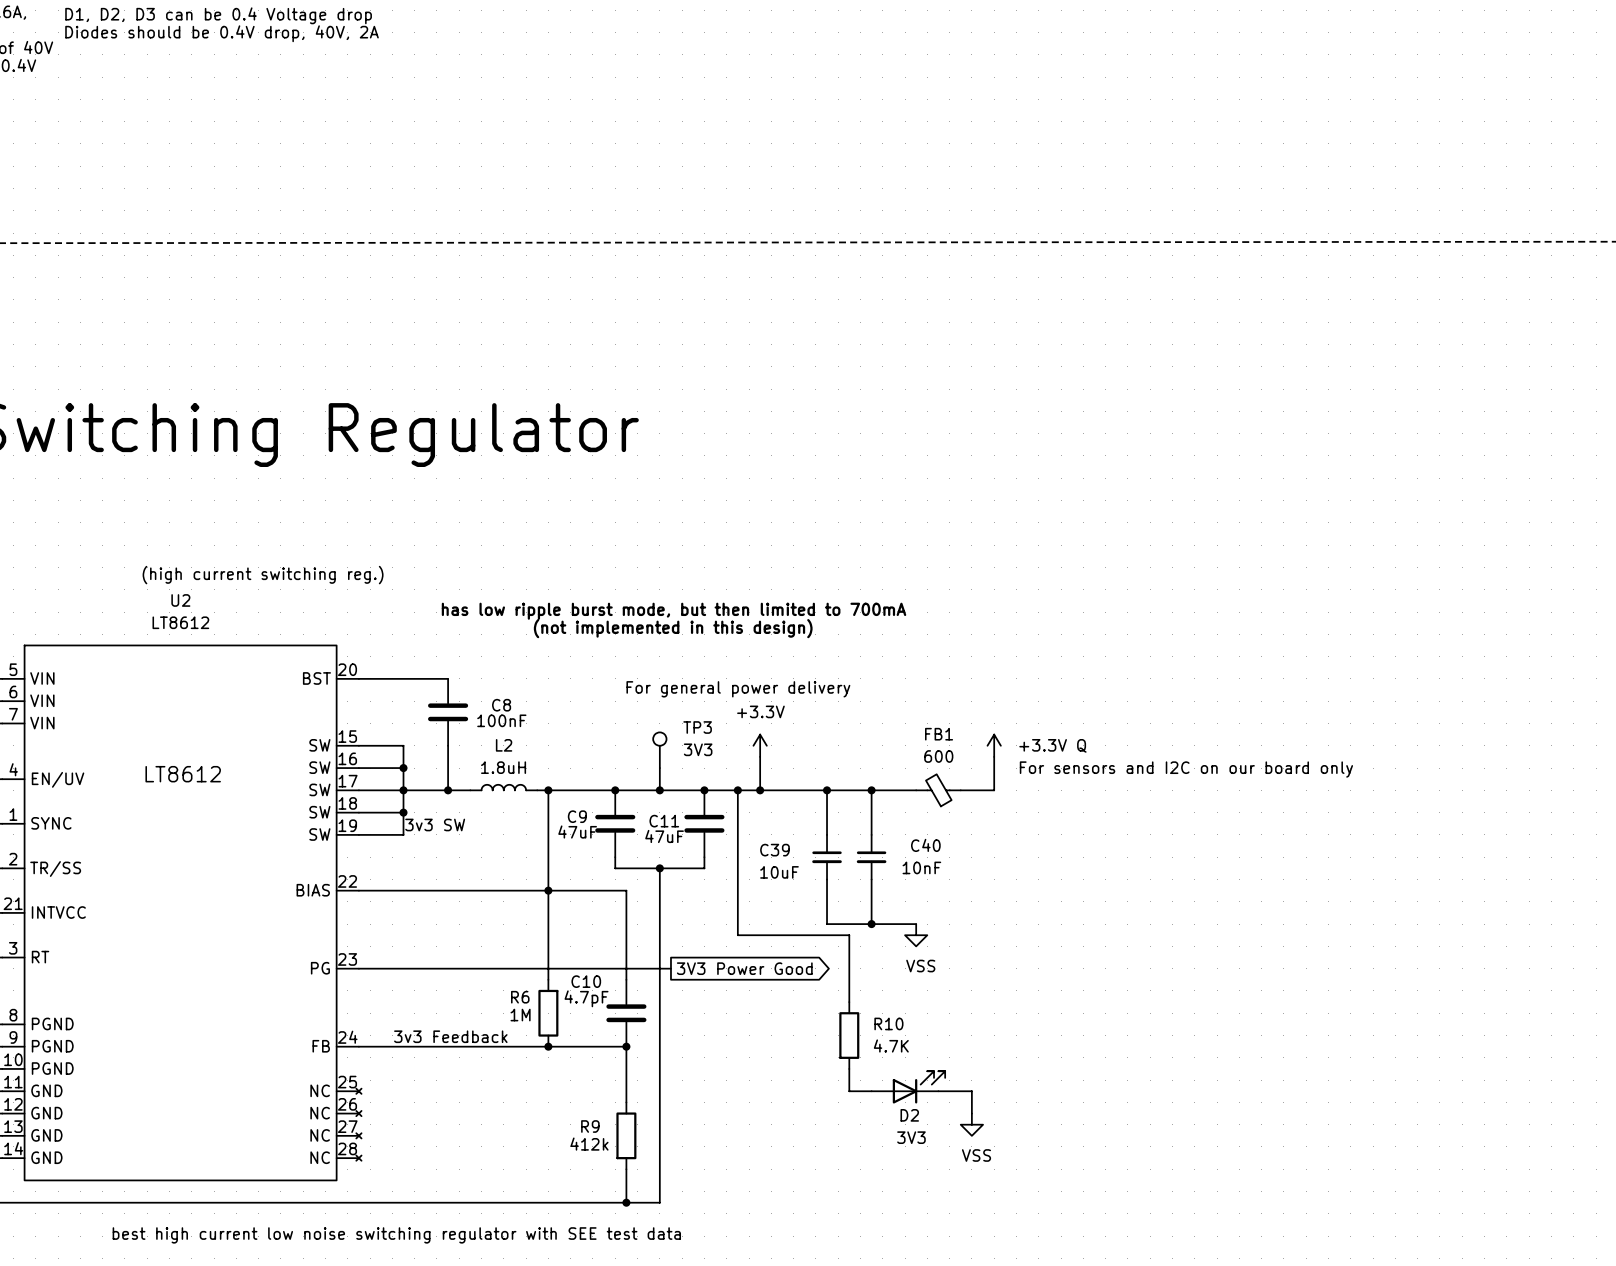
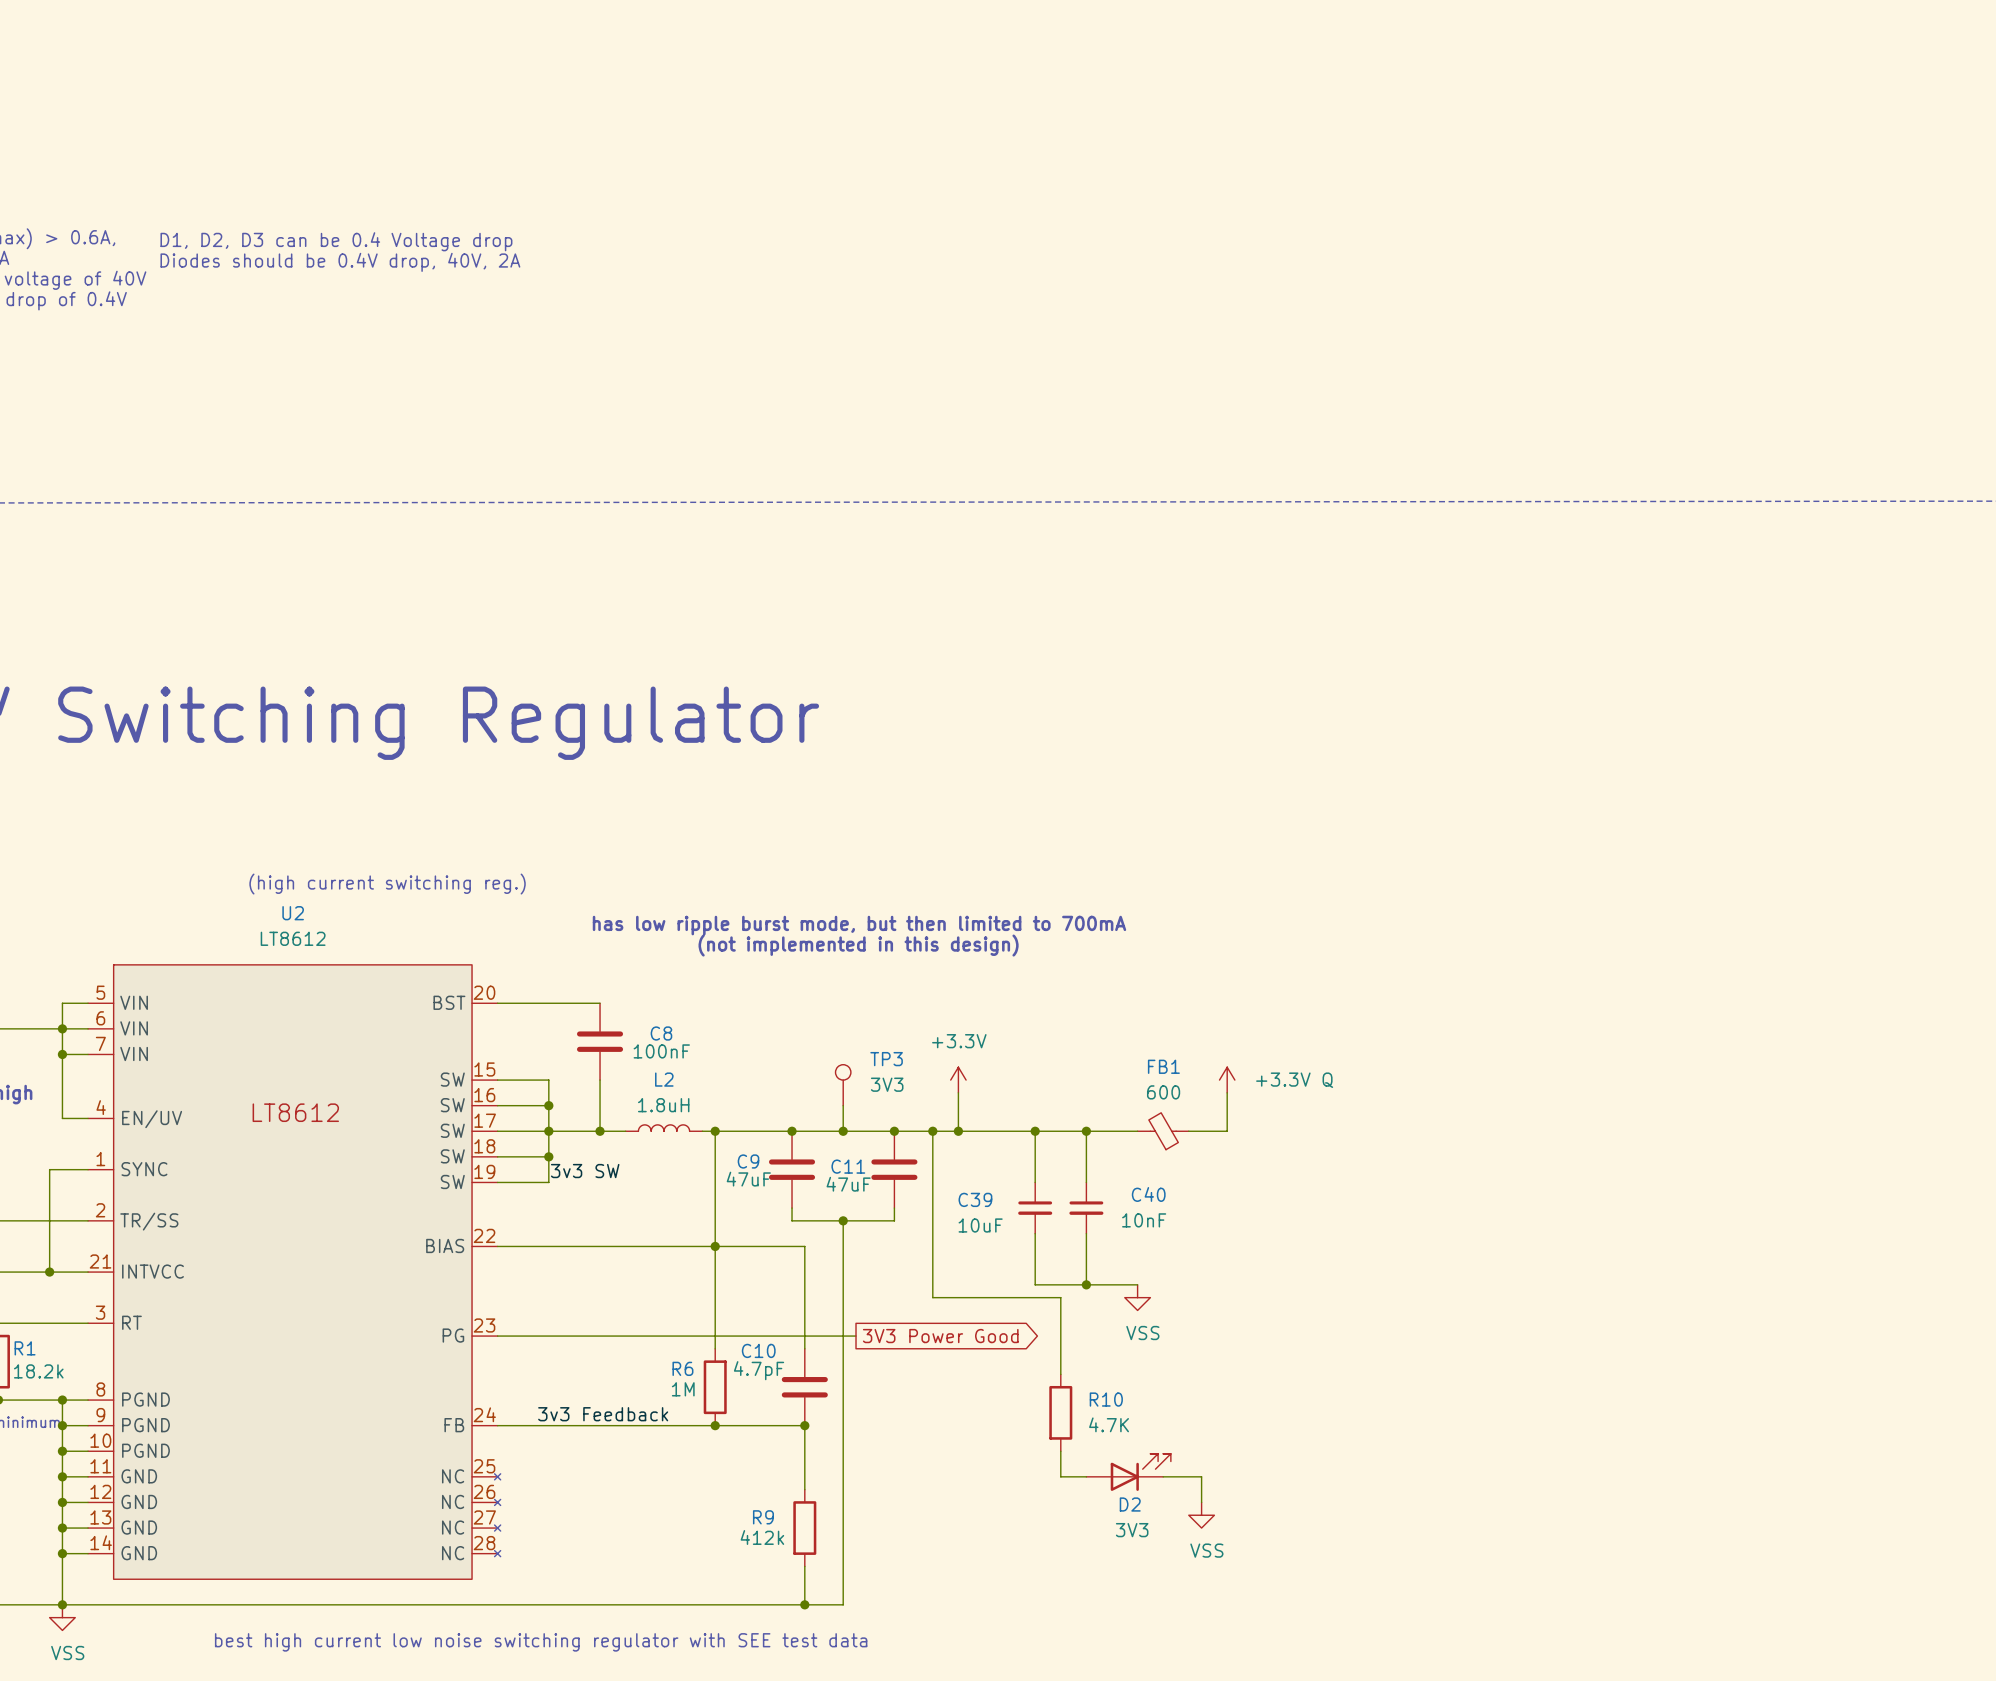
text: For general power delivery (738, 689) -> none
text: For sensors and I2C on our board only (1186, 769) -> none

